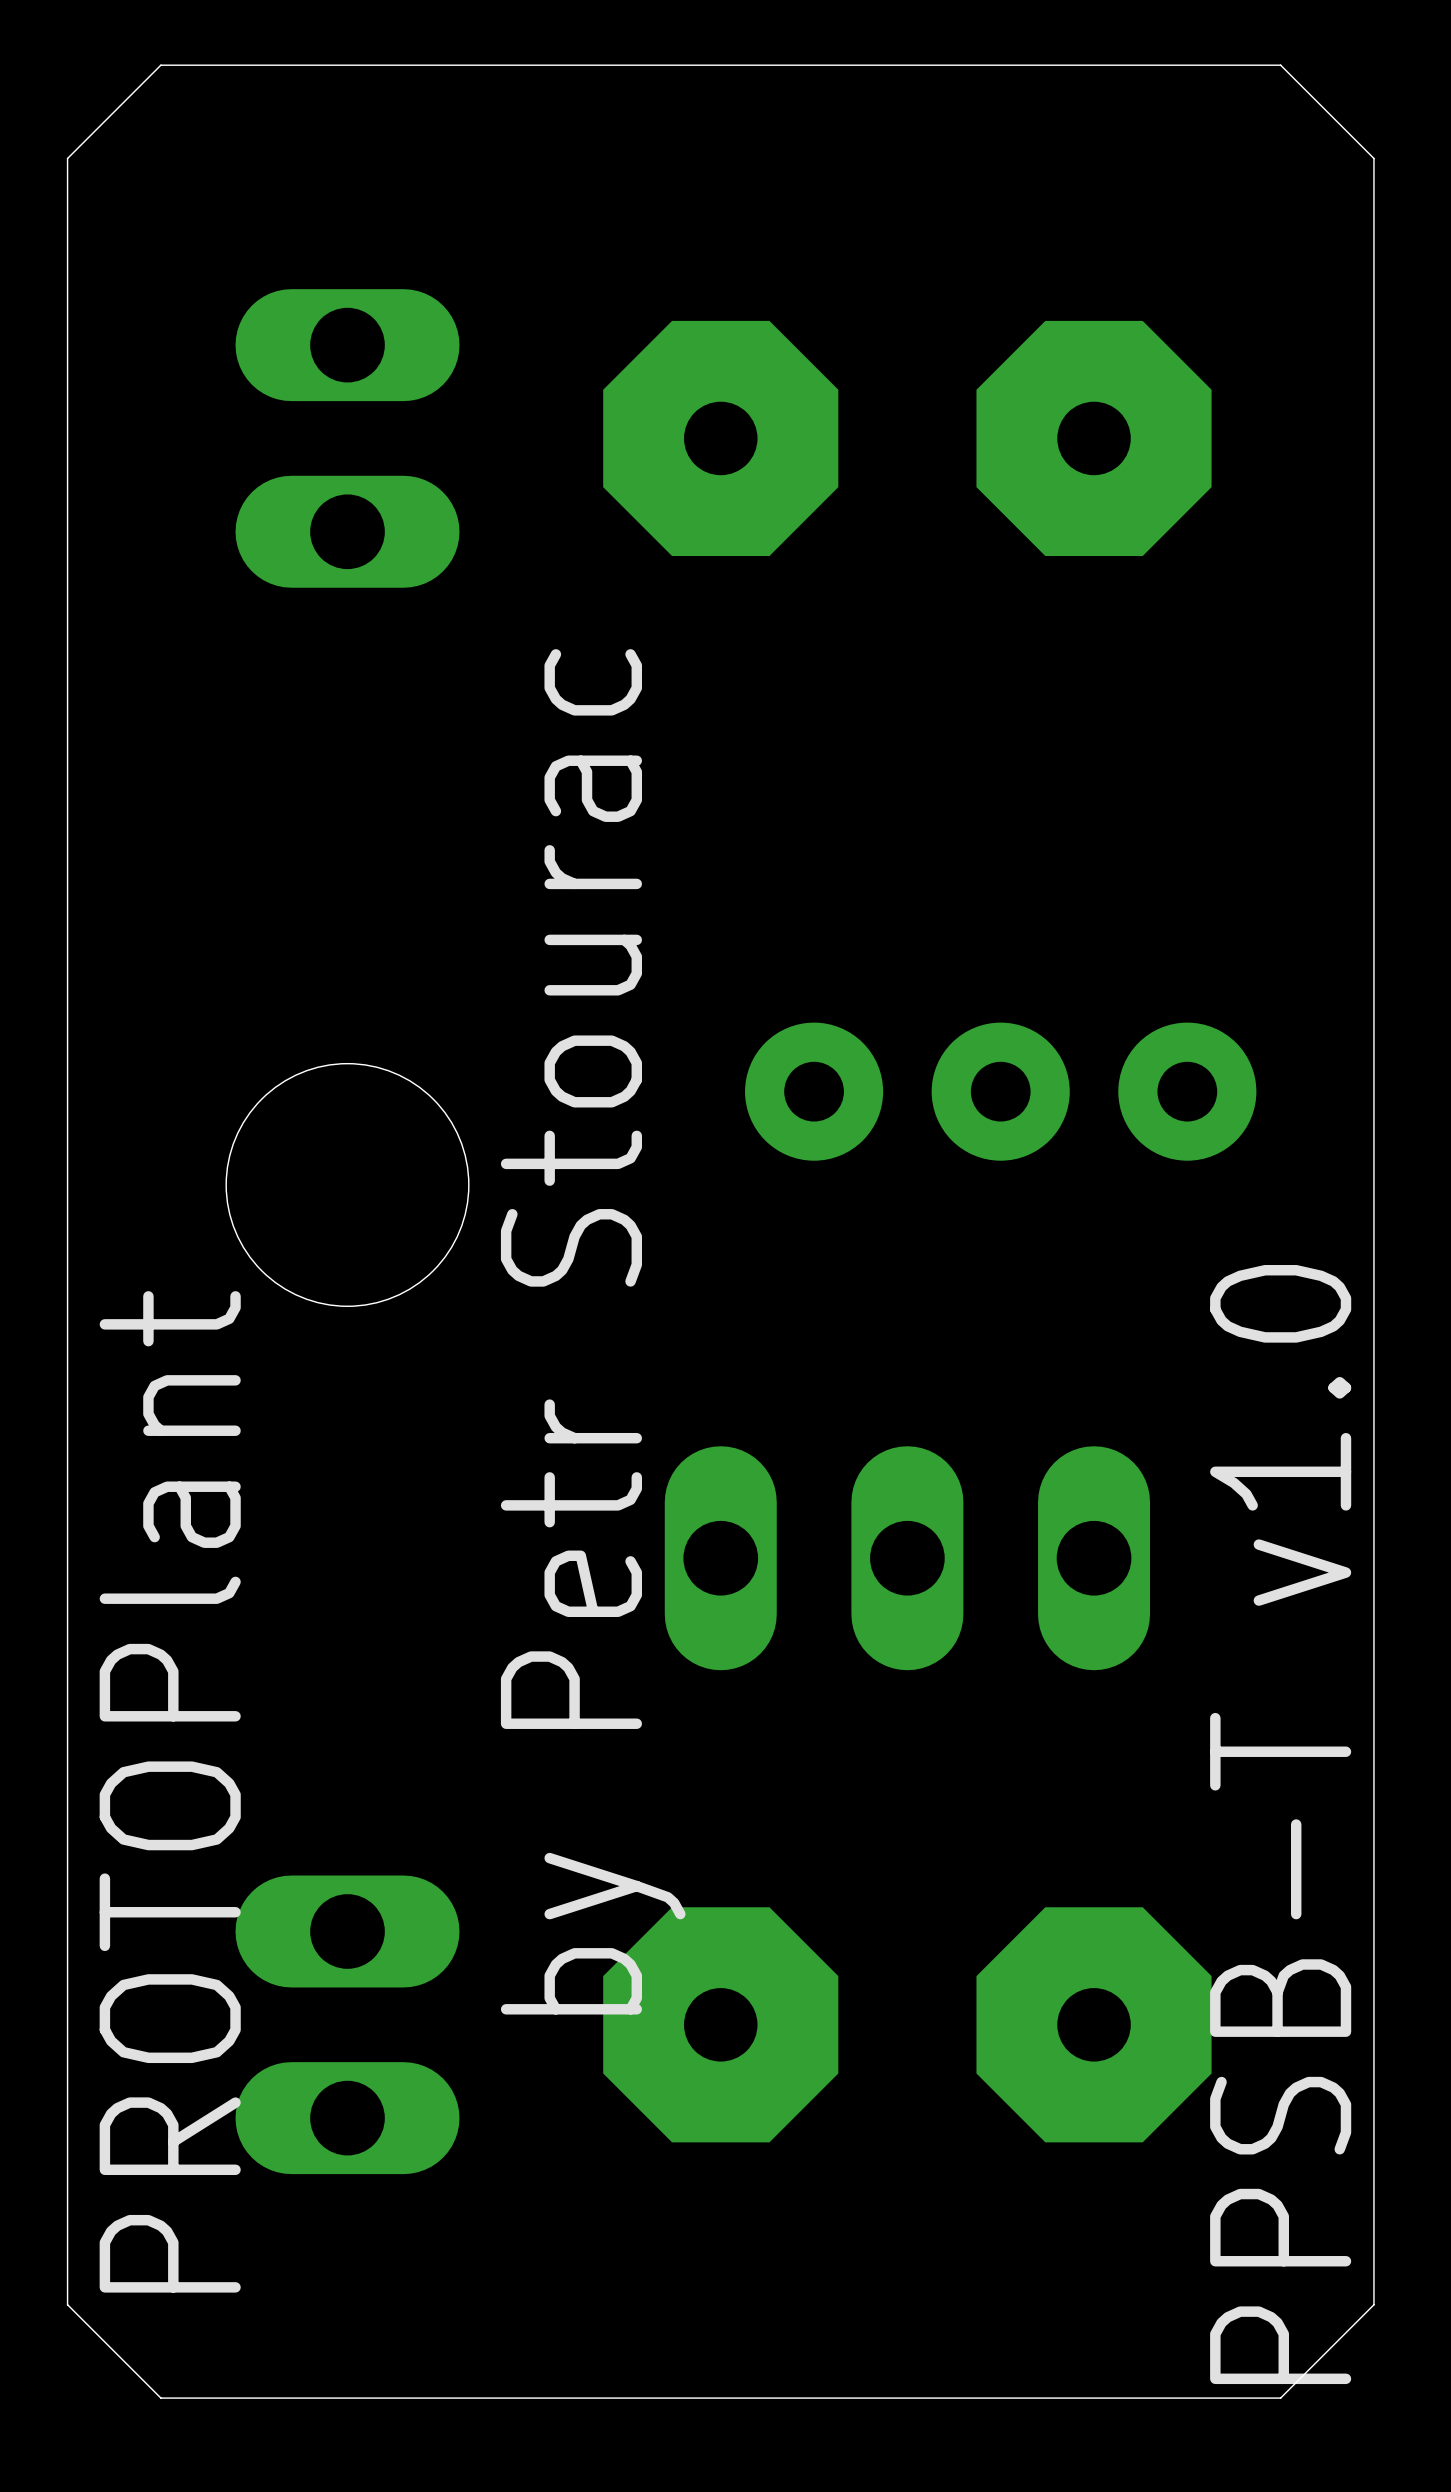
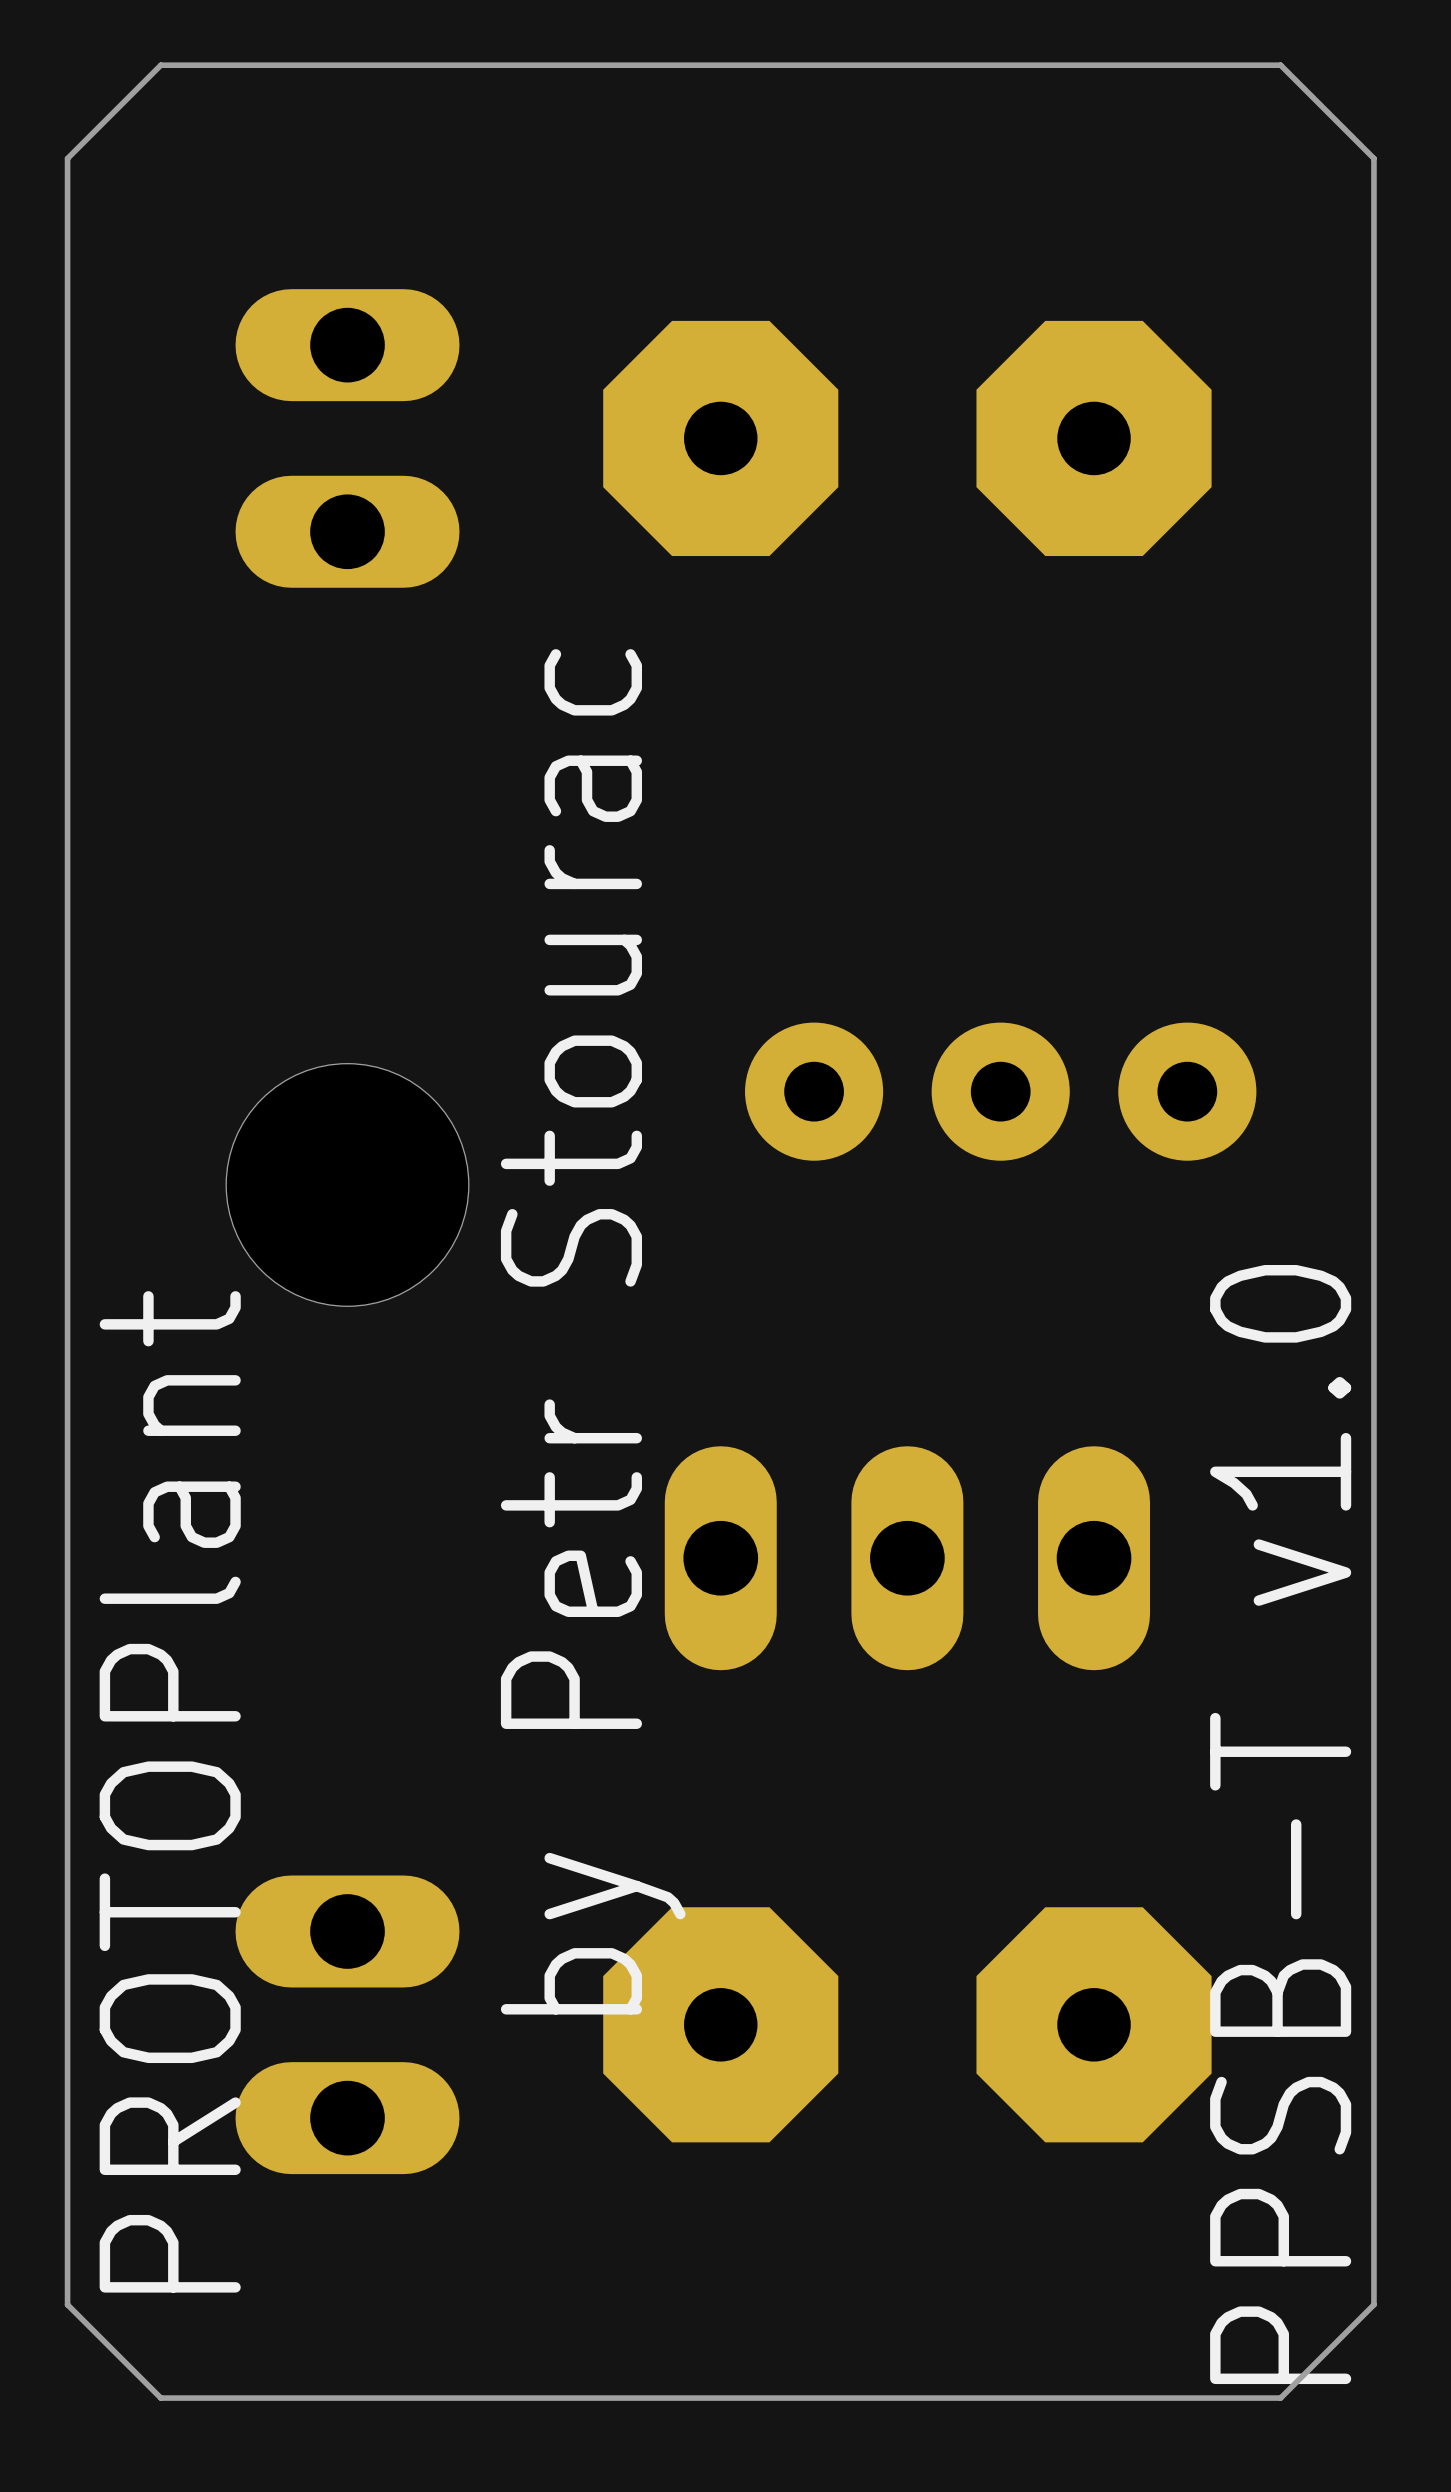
board edge width: thin (1280, 65) (160, 65) (67, 158) (67, 2304) (160, 2398) (1280, 2398) (1373, 2304) (1373, 158) (1280, 65) -> thick (1280, 65) (160, 65) (67, 158) (67, 2304) (160, 2398) (1280, 2398) (1373, 2304) (1373, 158) (1280, 65)

